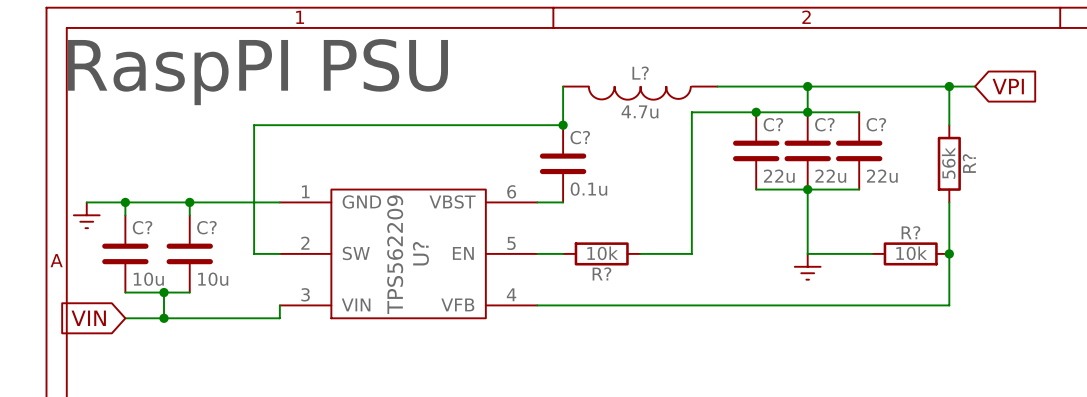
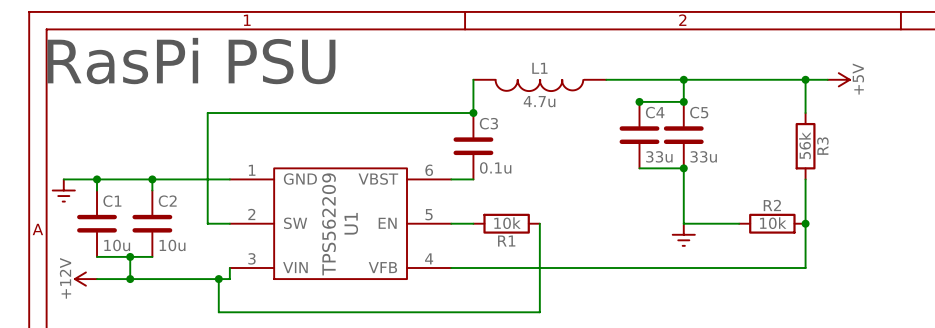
text: RaspPI PSU (257, 72) -> RasPi PSU (191, 61)
L? name: L? (640, 73) -> L1 (539, 68)
power symbol: none -> +5V (838, 79)
global label: VPI (1008, 86) -> none
wire: (756, 112) (691, 112) (691, 253) (640, 253) -> (218, 279) (218, 312) (539, 312) (539, 223)
wire: (807, 112) (859, 112) -> none
C? name: C? (773, 124) -> C4 (655, 112)
C? name: C? (824, 124) -> C5 (699, 112)
C? name: C? (580, 137) -> C3 (488, 123)
C?: 22u (859, 150) -> none
R? name: R? (969, 163) -> R3 (822, 146)
C? value: 22u (779, 176) -> 33u (659, 156)
C? value: 22u (830, 176) -> 33u (703, 156)
wire: (807, 189) (859, 189) -> none
C? name: C? (142, 227) -> C1 (112, 201)
C? name: C? (206, 227) -> C2 (167, 201)
R? name: R? (910, 232) -> R2 (772, 205)
U? name: U? (420, 253) -> U1 (351, 223)
R? name: R? (601, 273) -> R1 (506, 241)
global label: VIN (88, 318) -> none
power symbol: none -> +12V (85, 279)
junction: none -> (218, 279)

